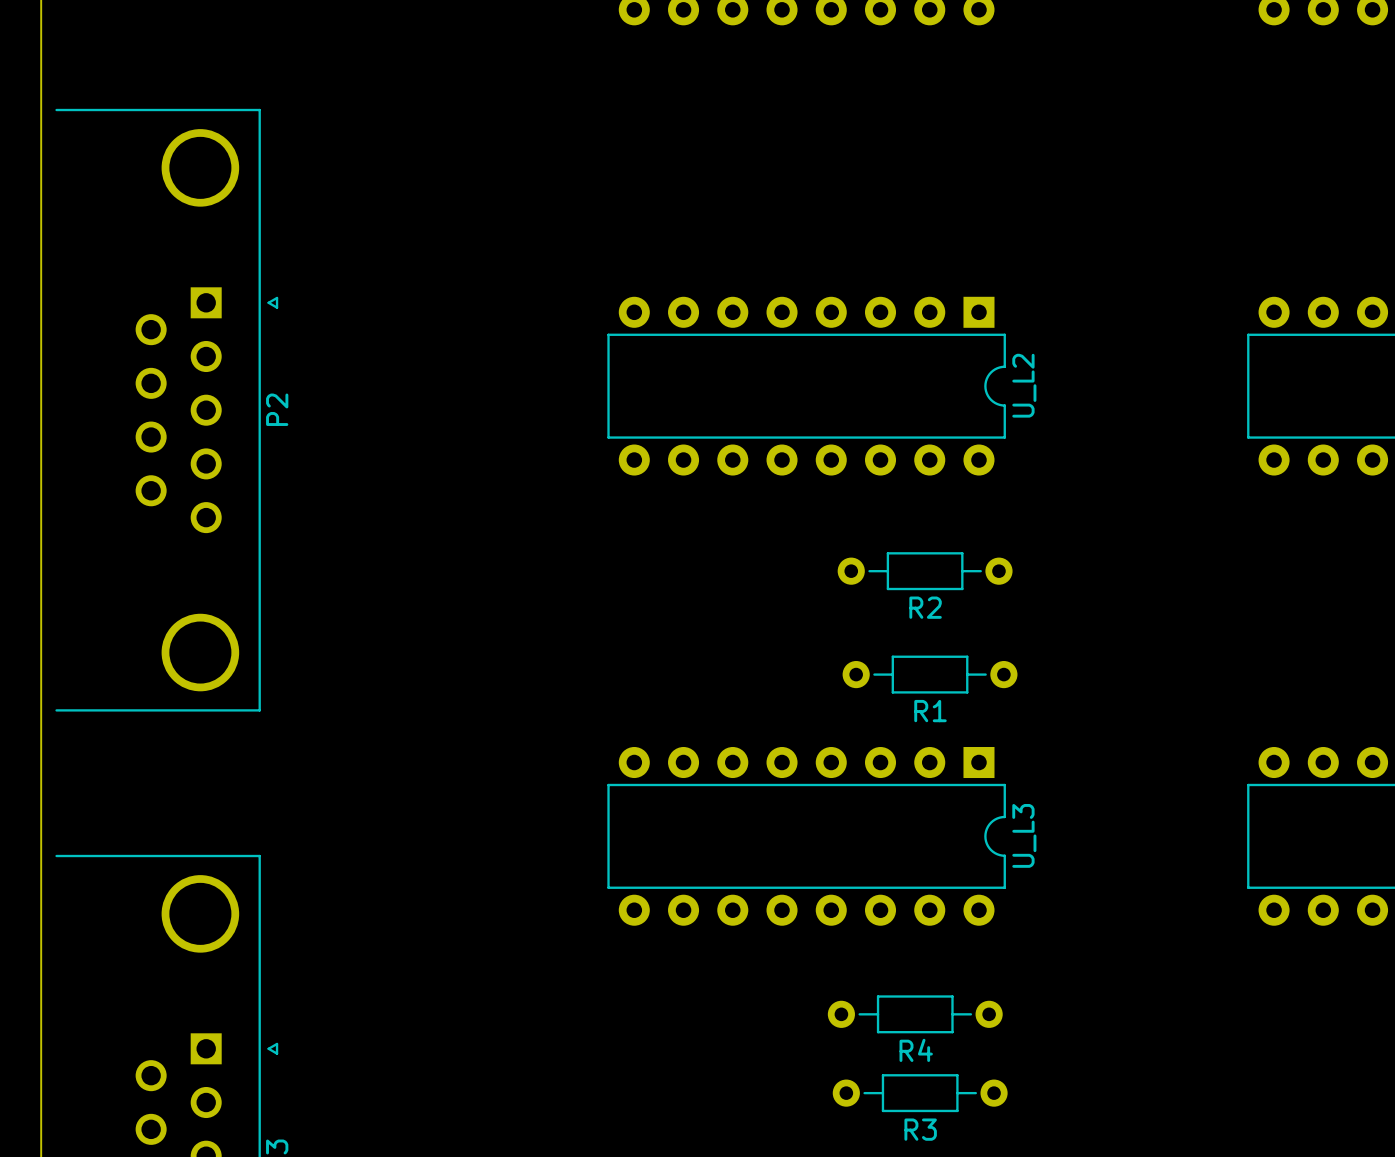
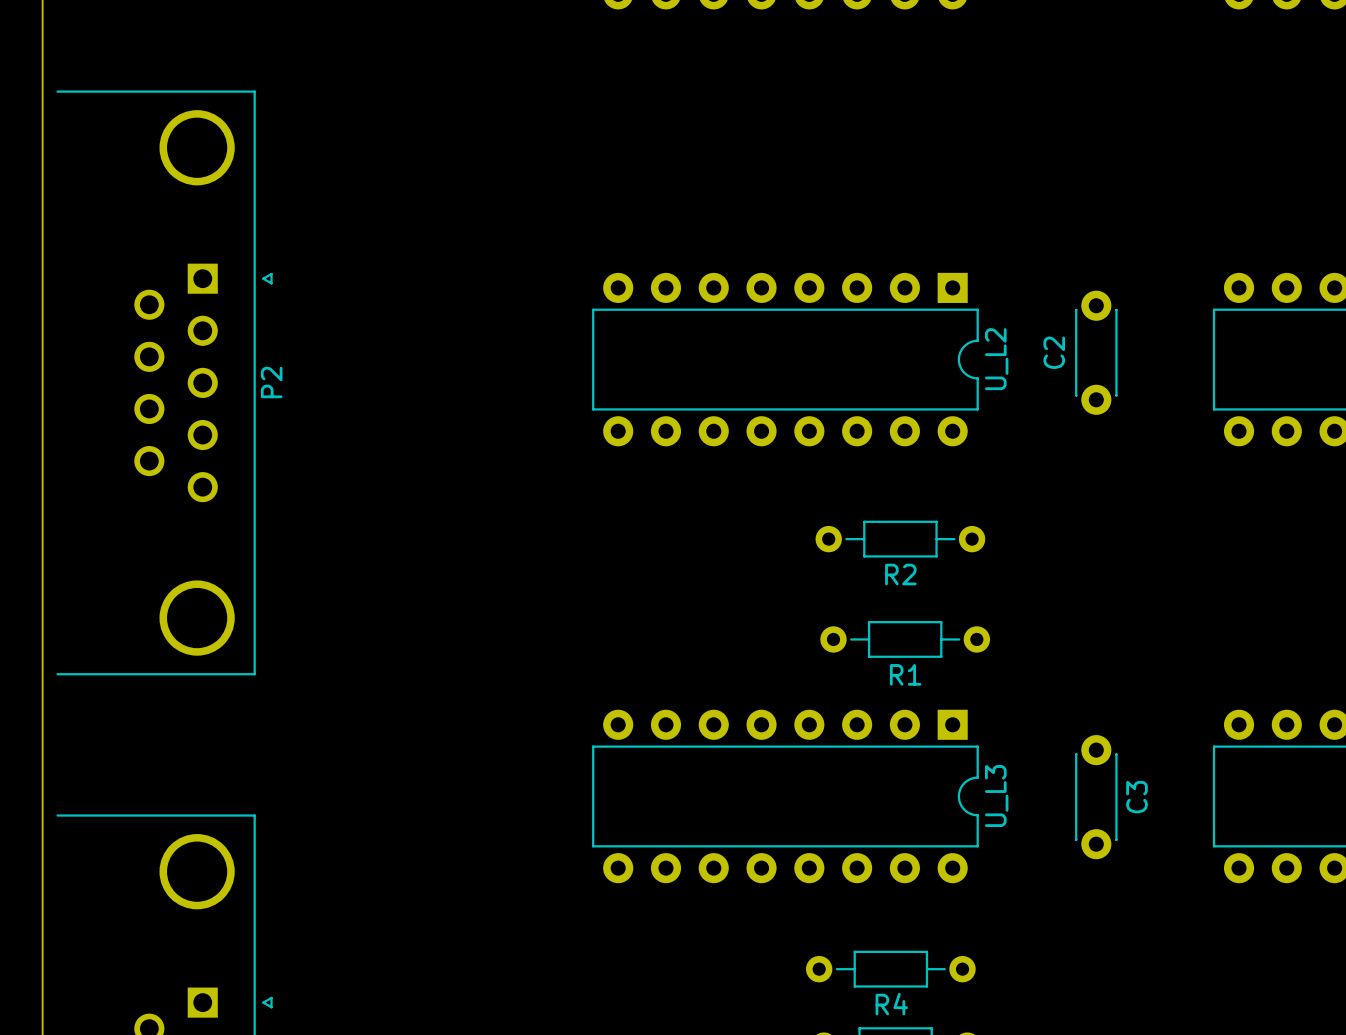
C2: none -> (1096, 352)
C3: none -> (1096, 797)

